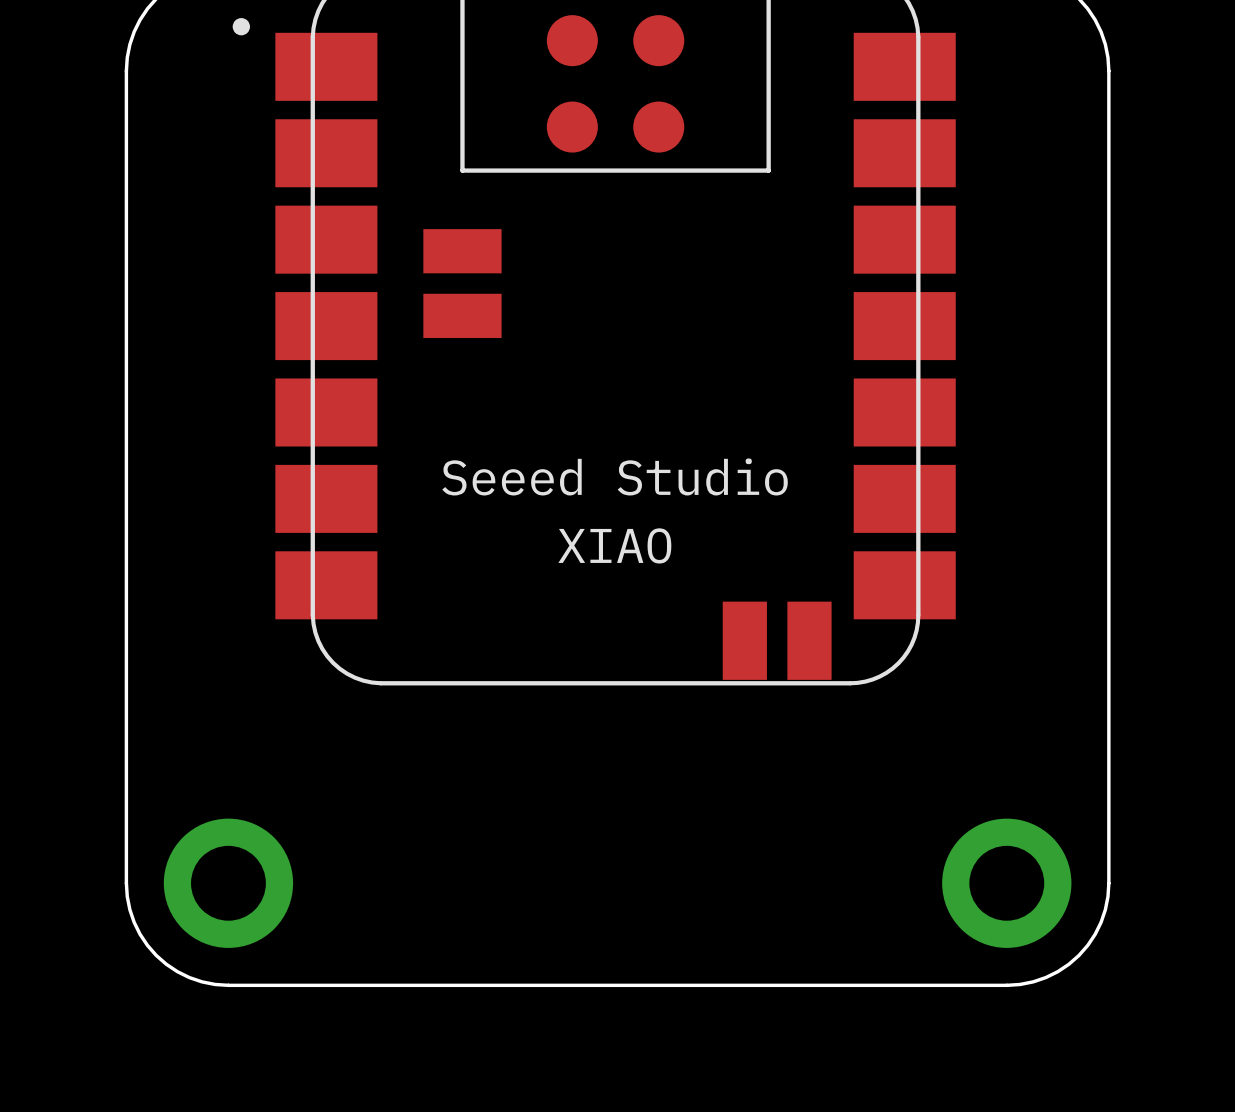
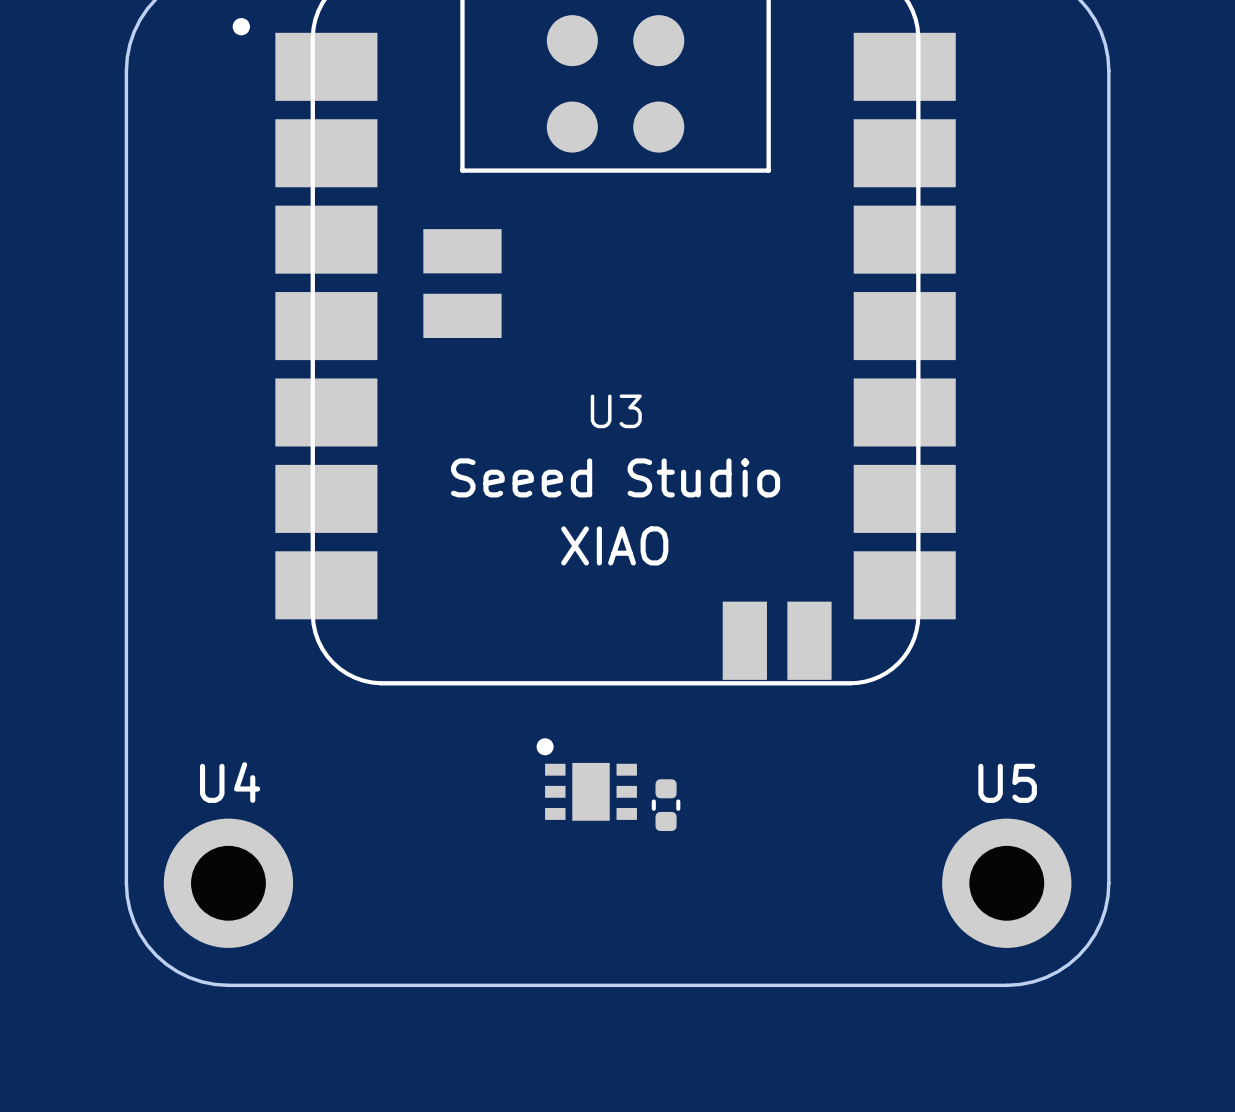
U3 name: none -> U3 (616, 411)
part: none -> (586, 779)
U4 name: none -> U4 (230, 782)
U5 name: none -> U5 (1007, 783)
part: none -> (666, 805)

